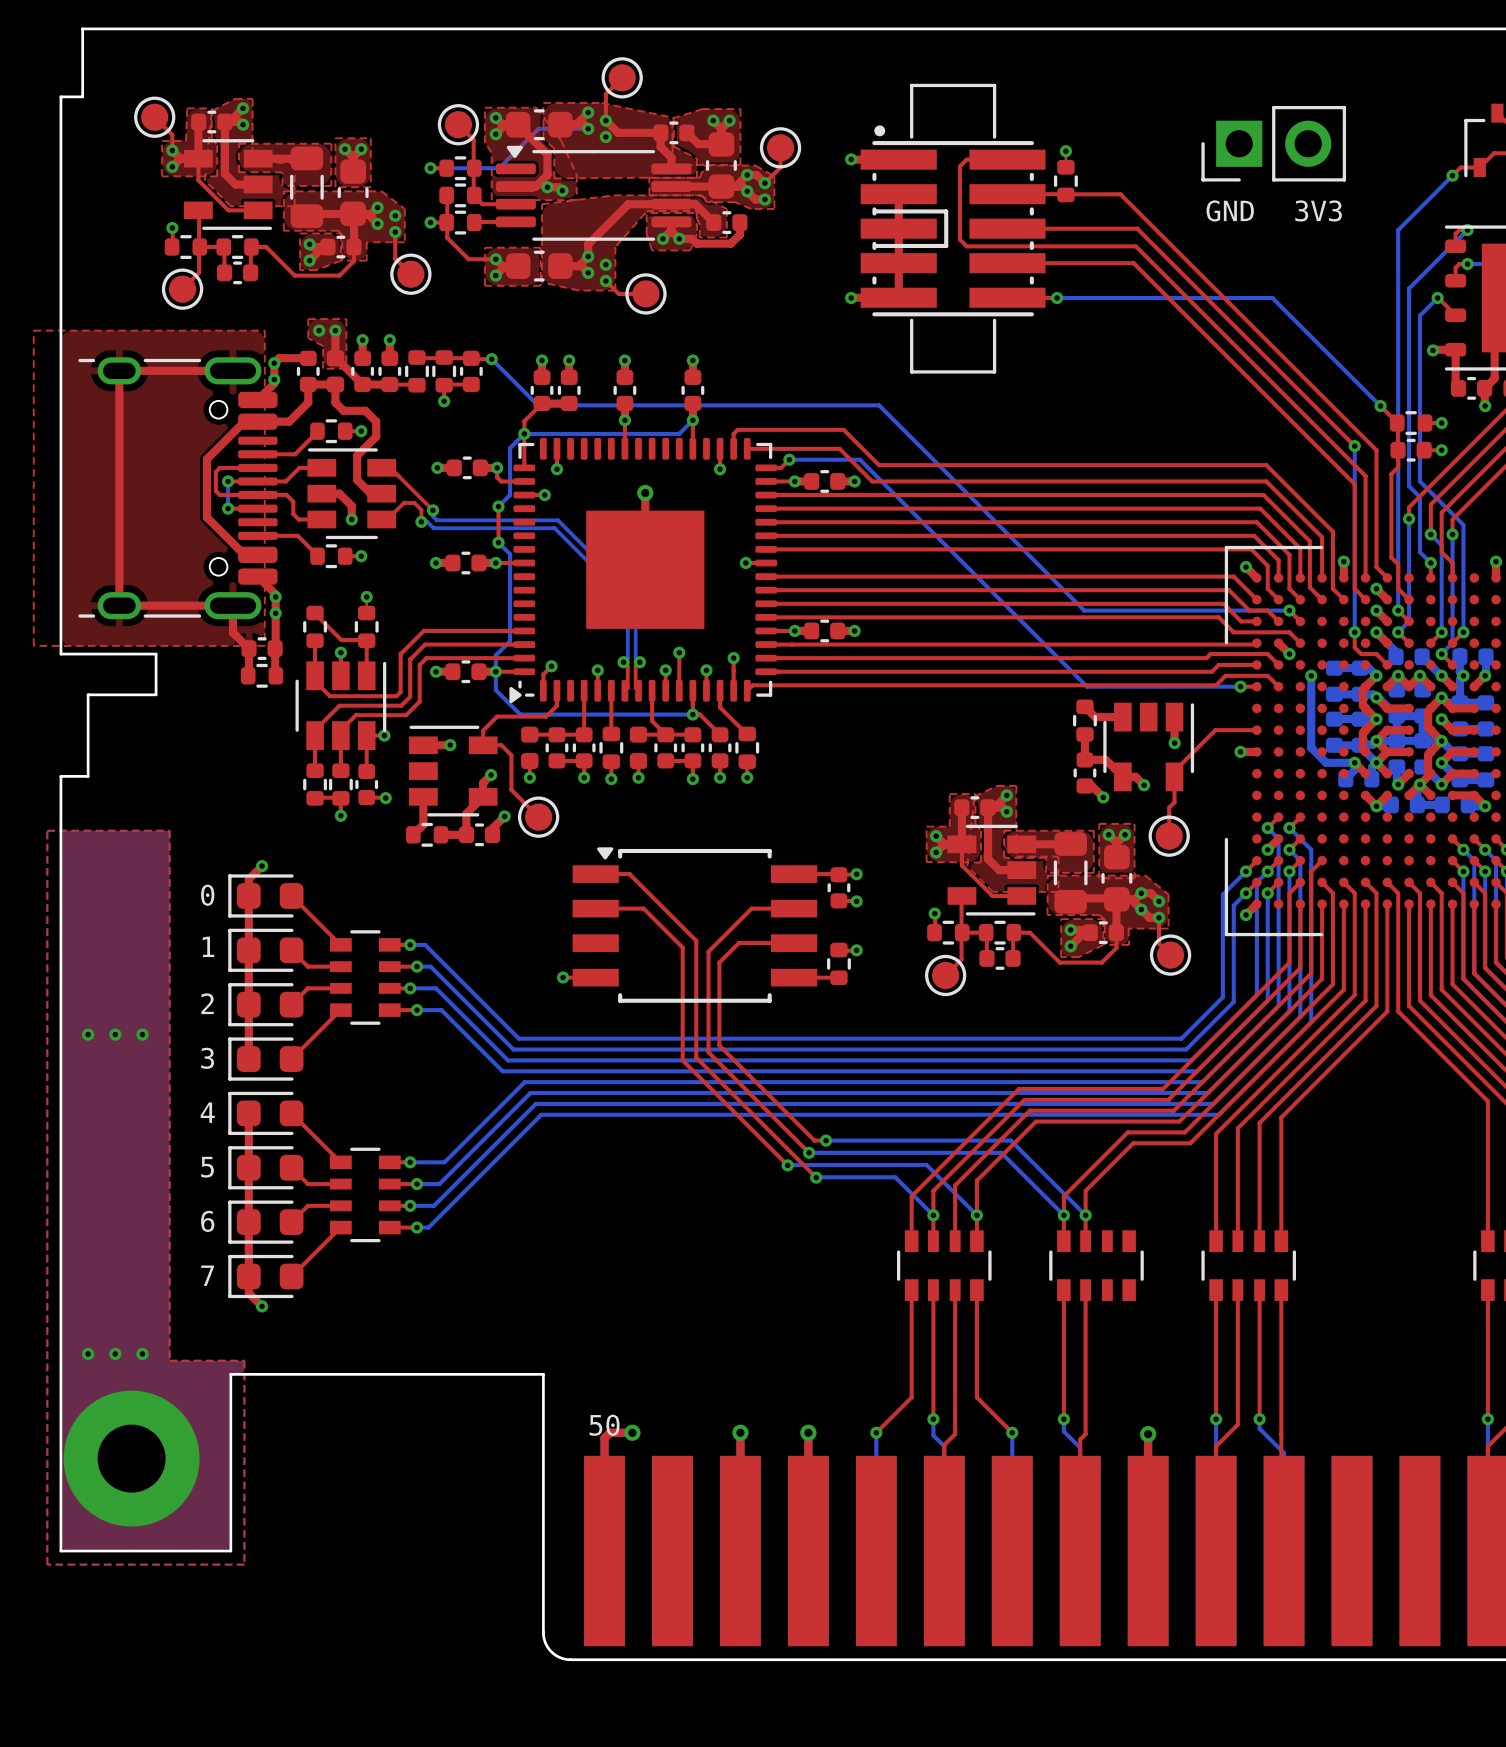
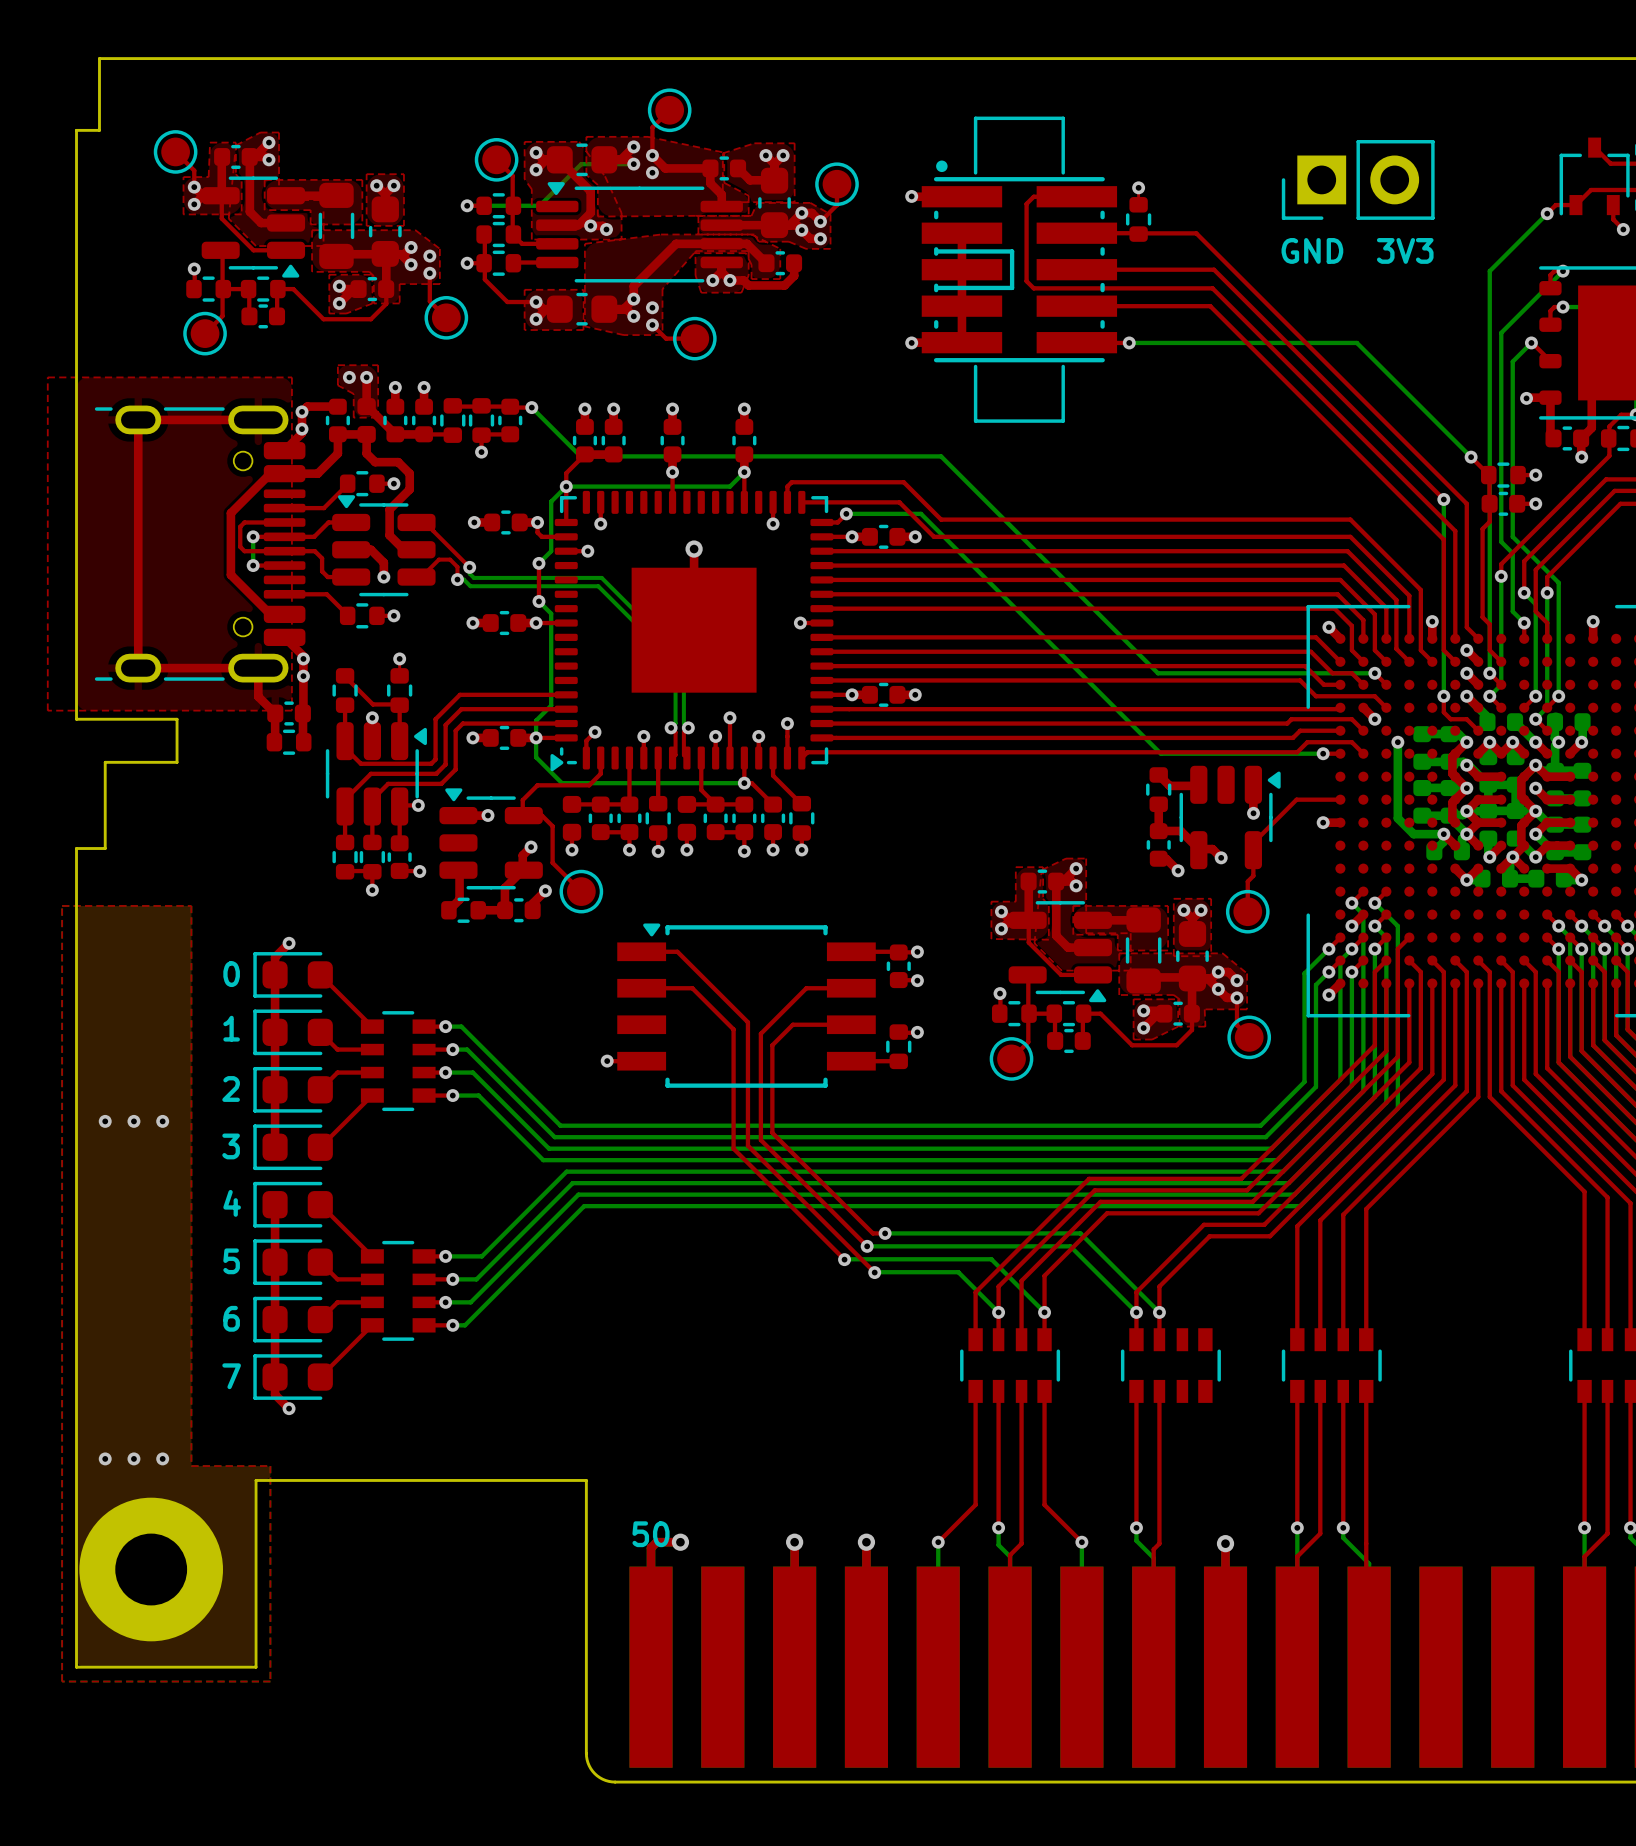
part footprint: [183, 139, 273, 230] -> [201, 176, 306, 278]
part footprint: [307, 448, 397, 540] -> [332, 495, 436, 597]
part footprint: [295, 661, 387, 751] -> [325, 722, 427, 826]
part footprint: [1103, 702, 1195, 792] -> [1179, 765, 1281, 870]
part footprint: [408, 725, 498, 817] -> [439, 788, 543, 890]
part footprint: [947, 824, 1037, 916] -> [1008, 901, 1113, 1003]

